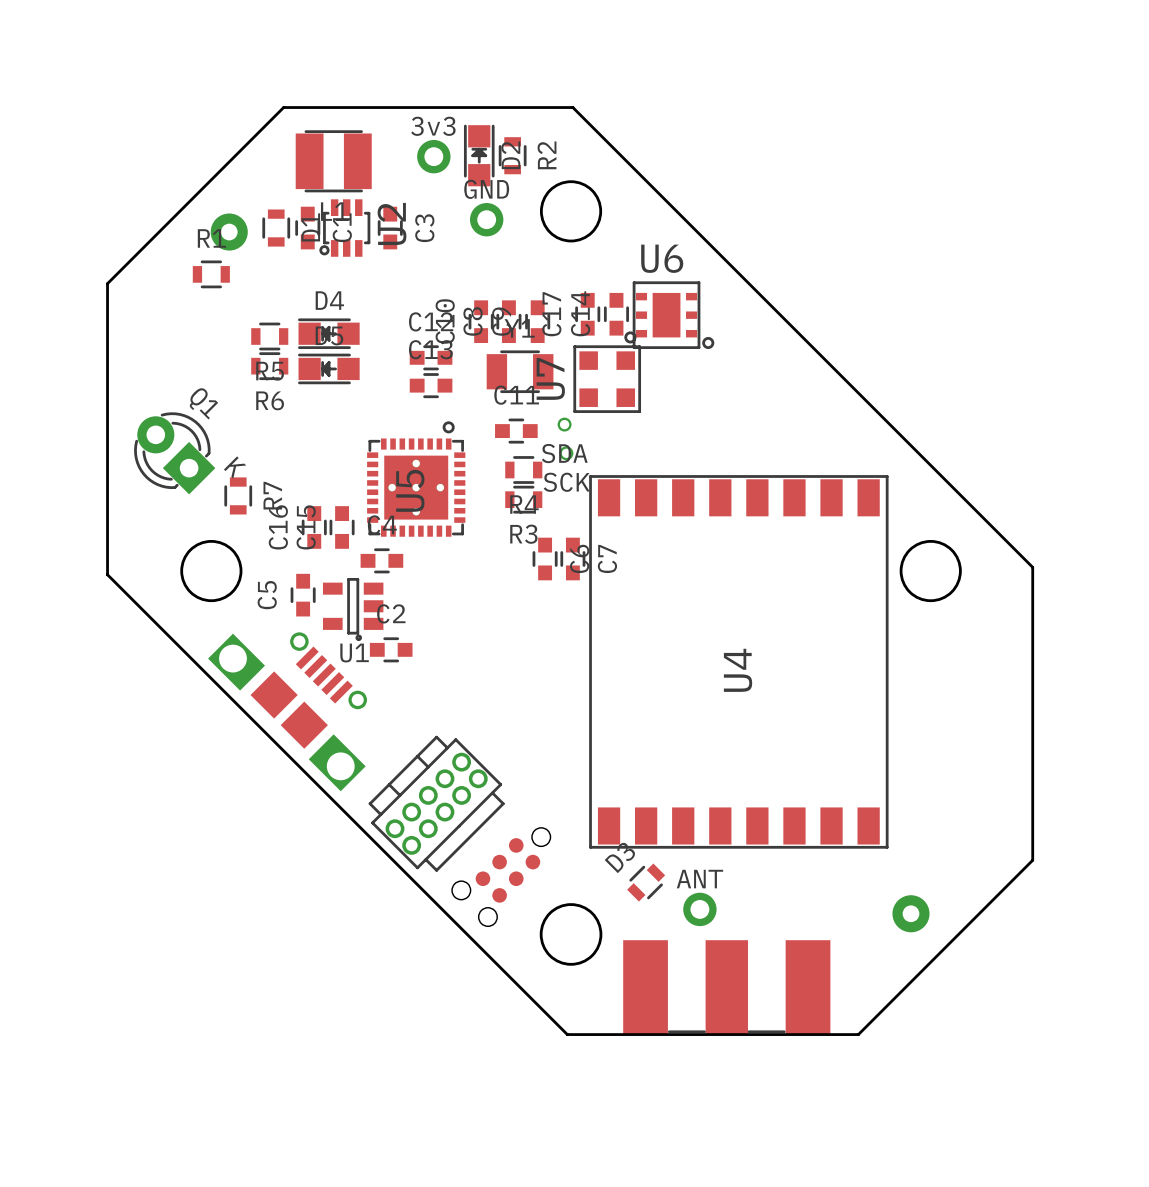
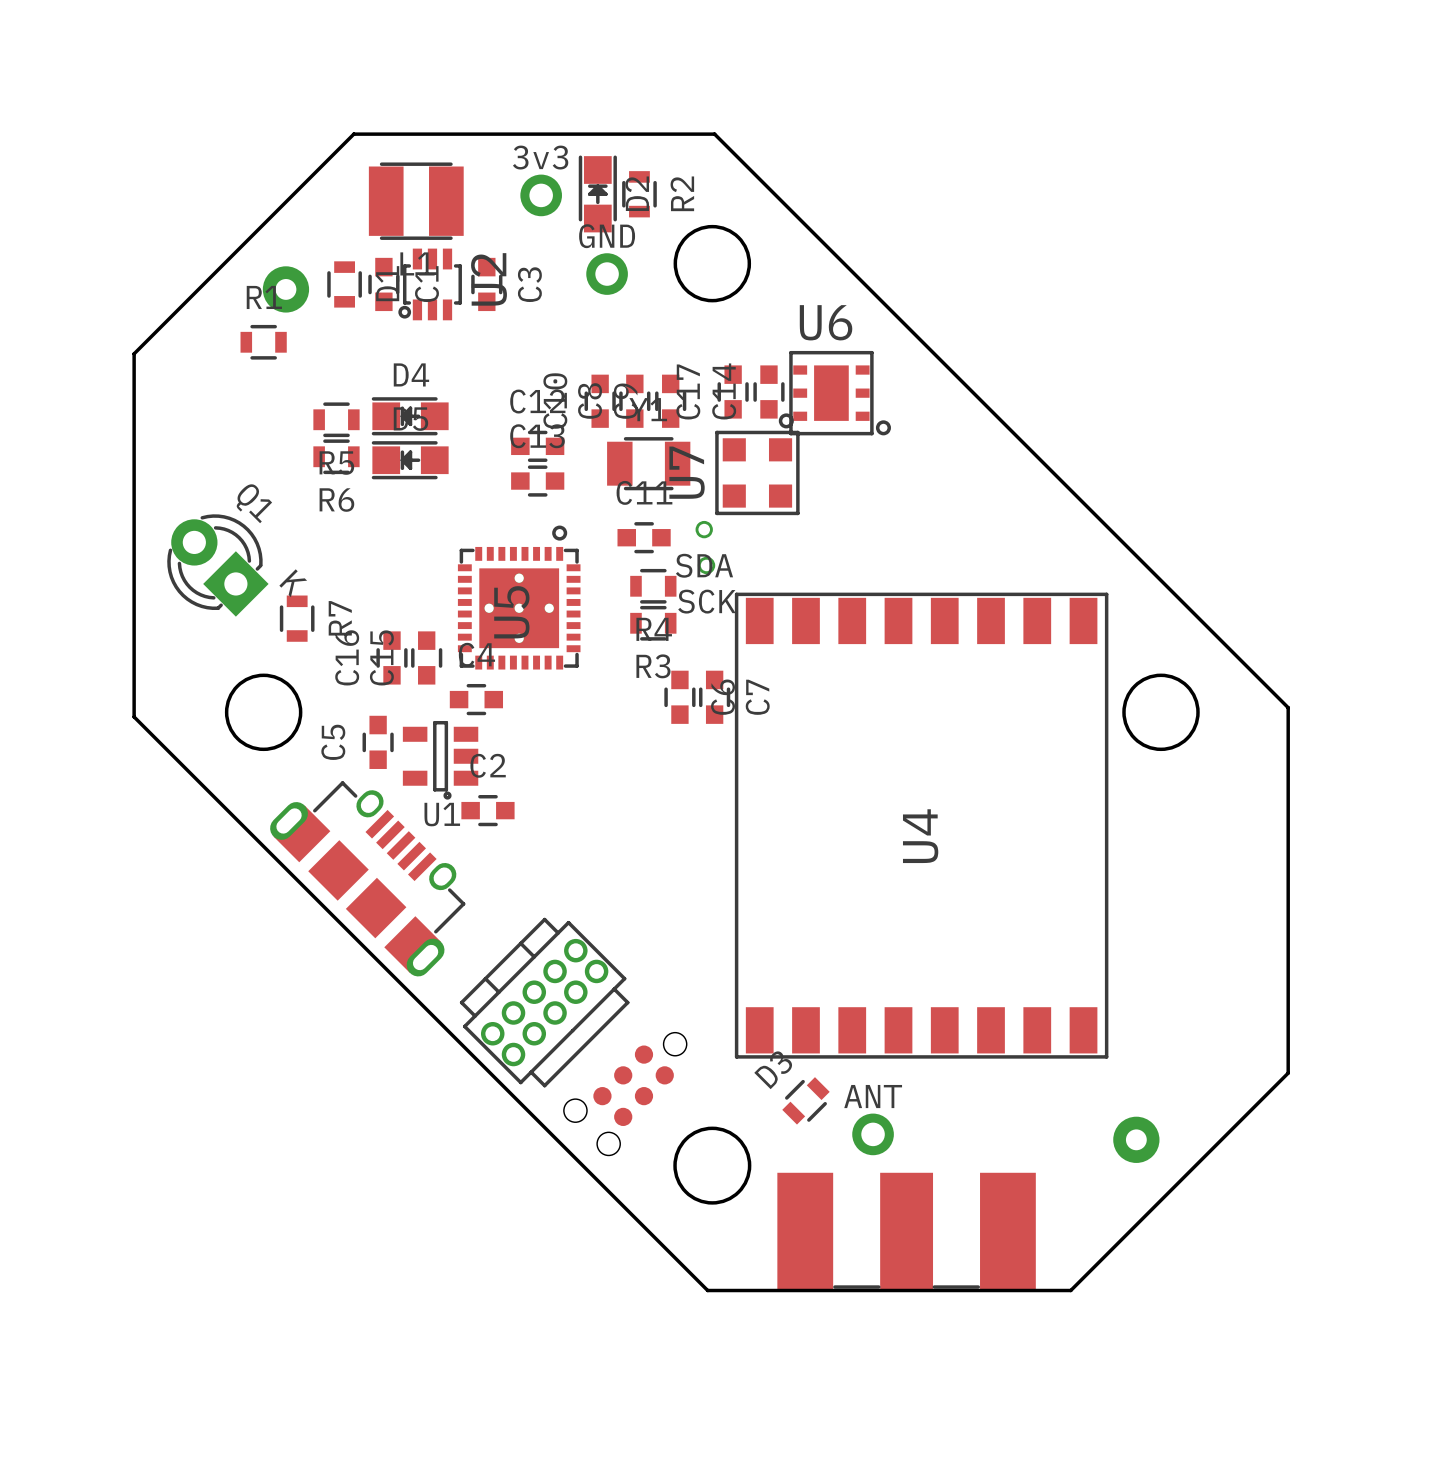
part footprint: [208, 632, 367, 792] -> [270, 781, 466, 977]

